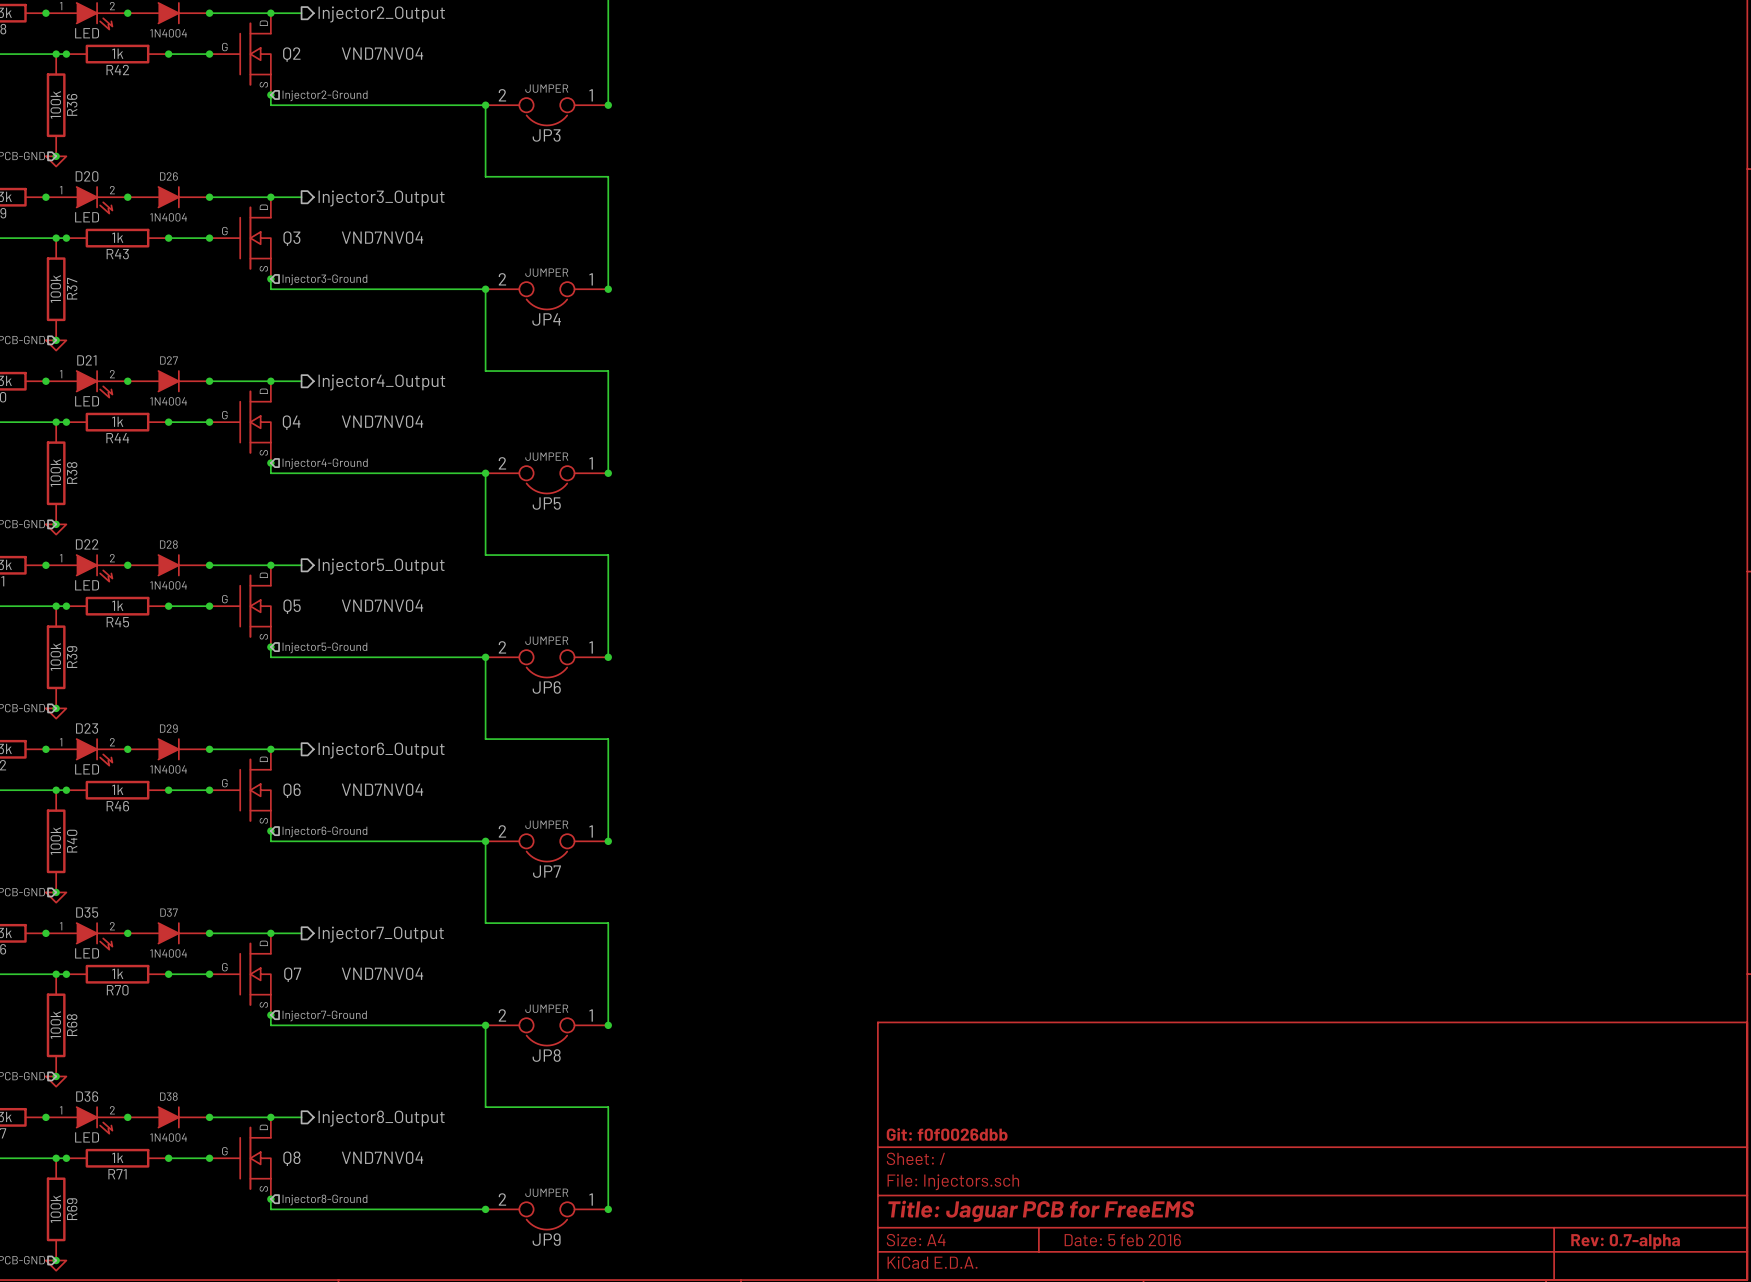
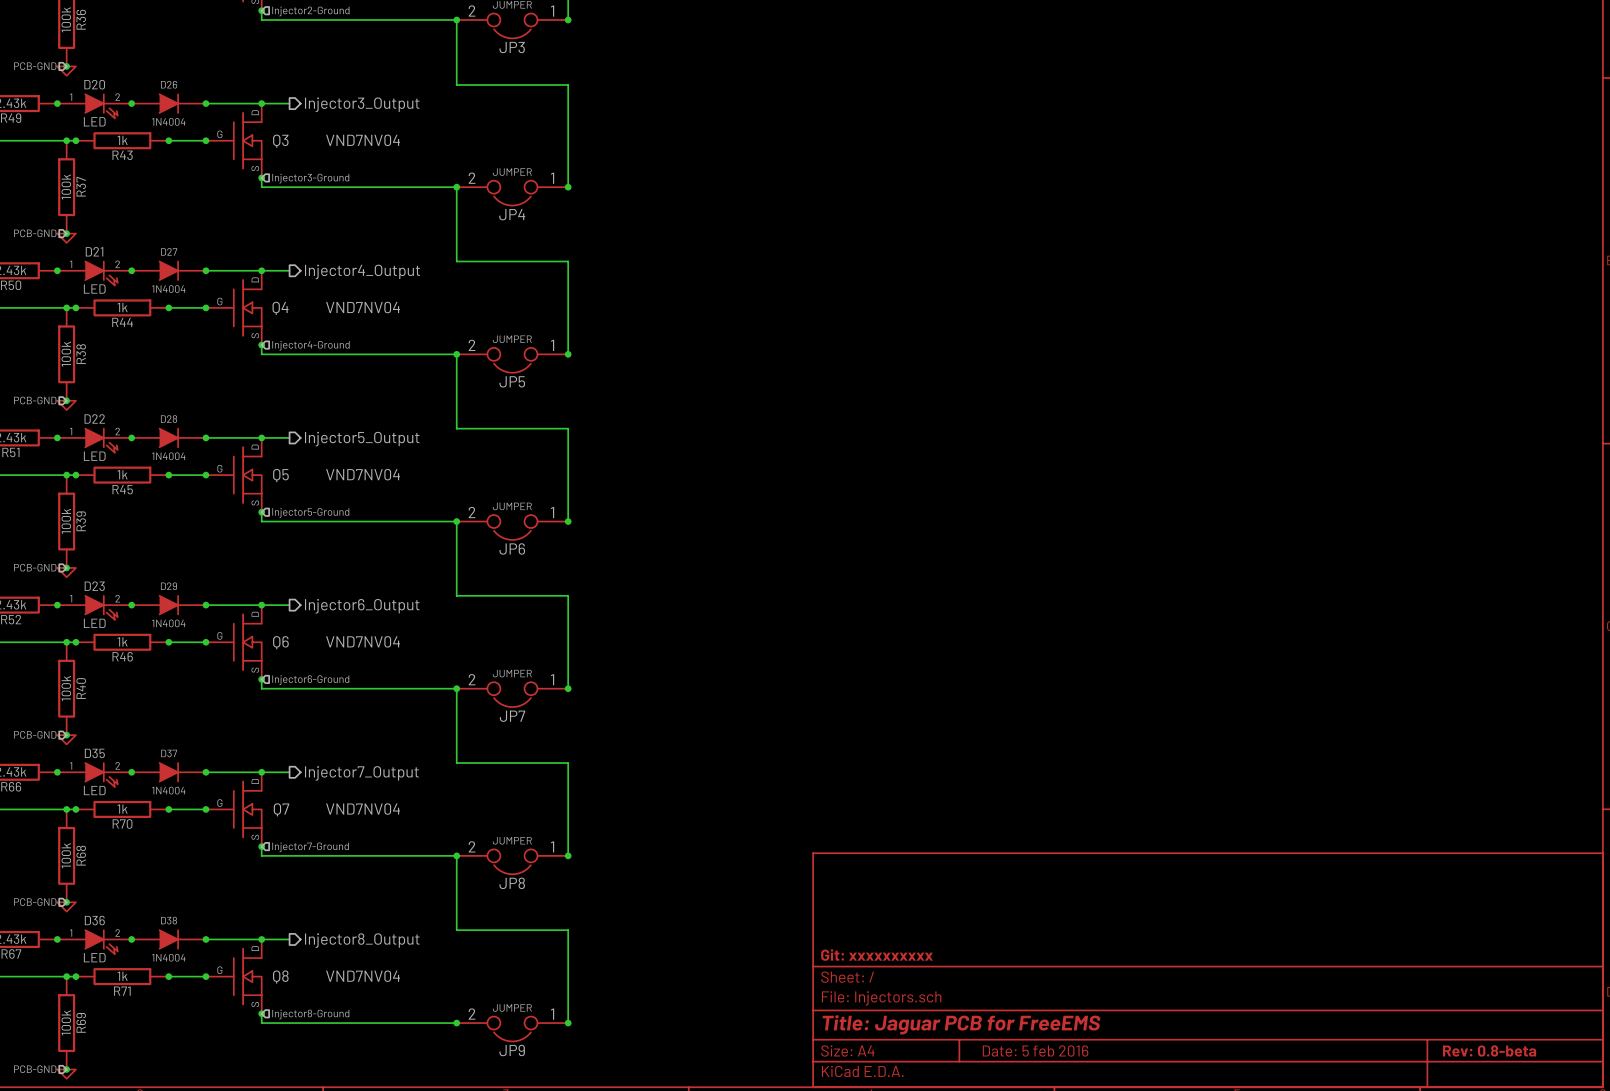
title block: Git: f0f0026dbb (947, 1134) -> Git: xxxxxxxxxx (876, 955)
title block: Rev: 0.7-alpha (1625, 1241) -> Rev: 0.8-beta (1489, 1050)

